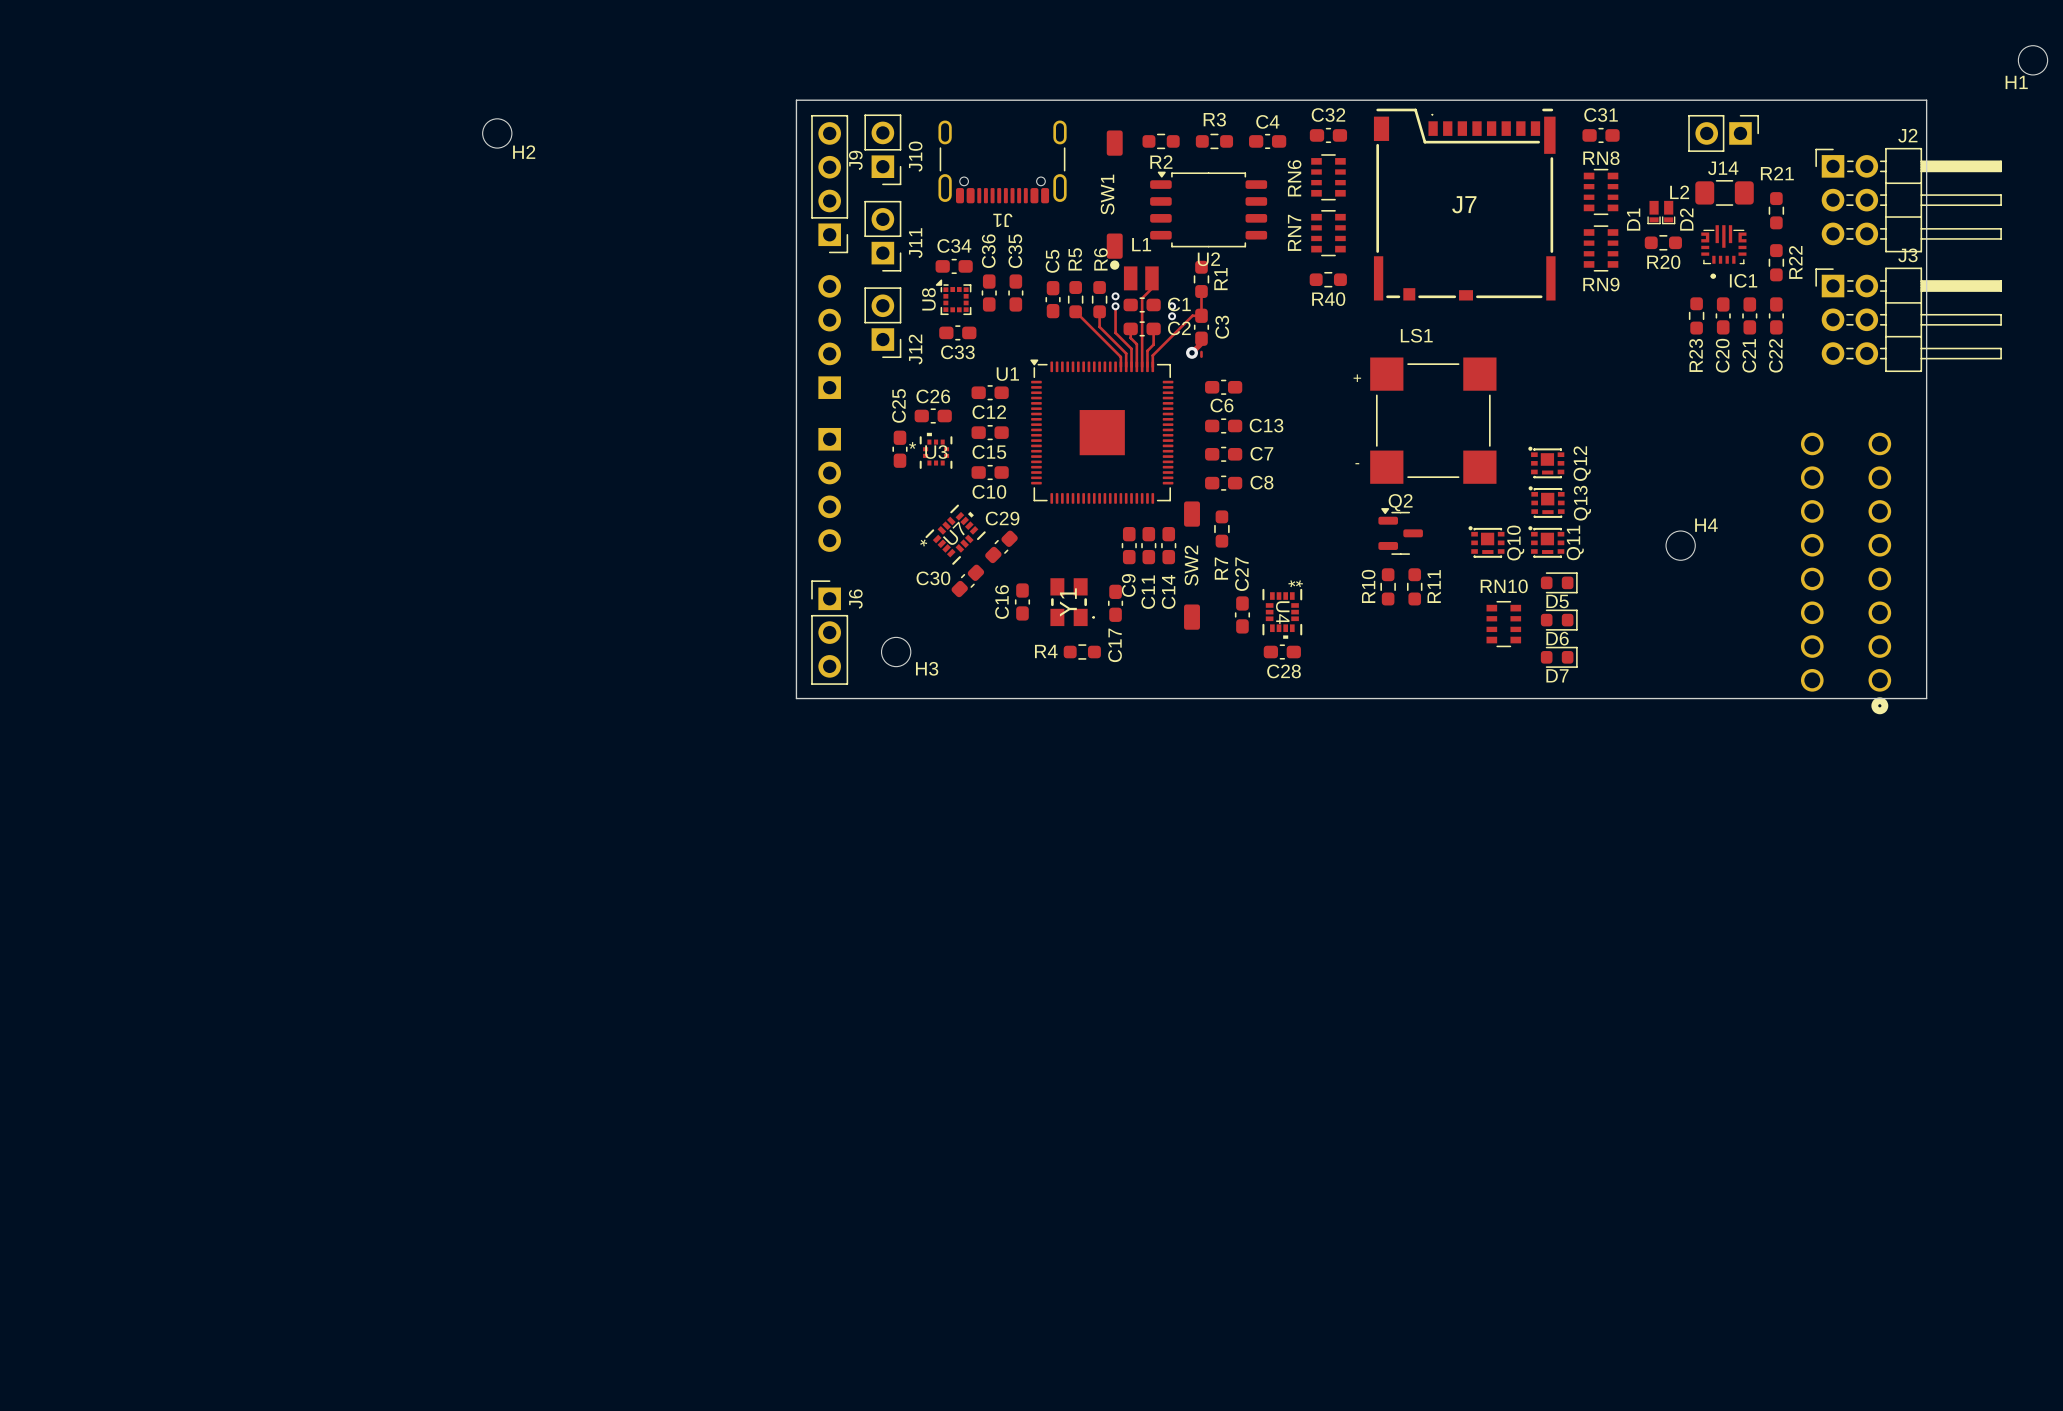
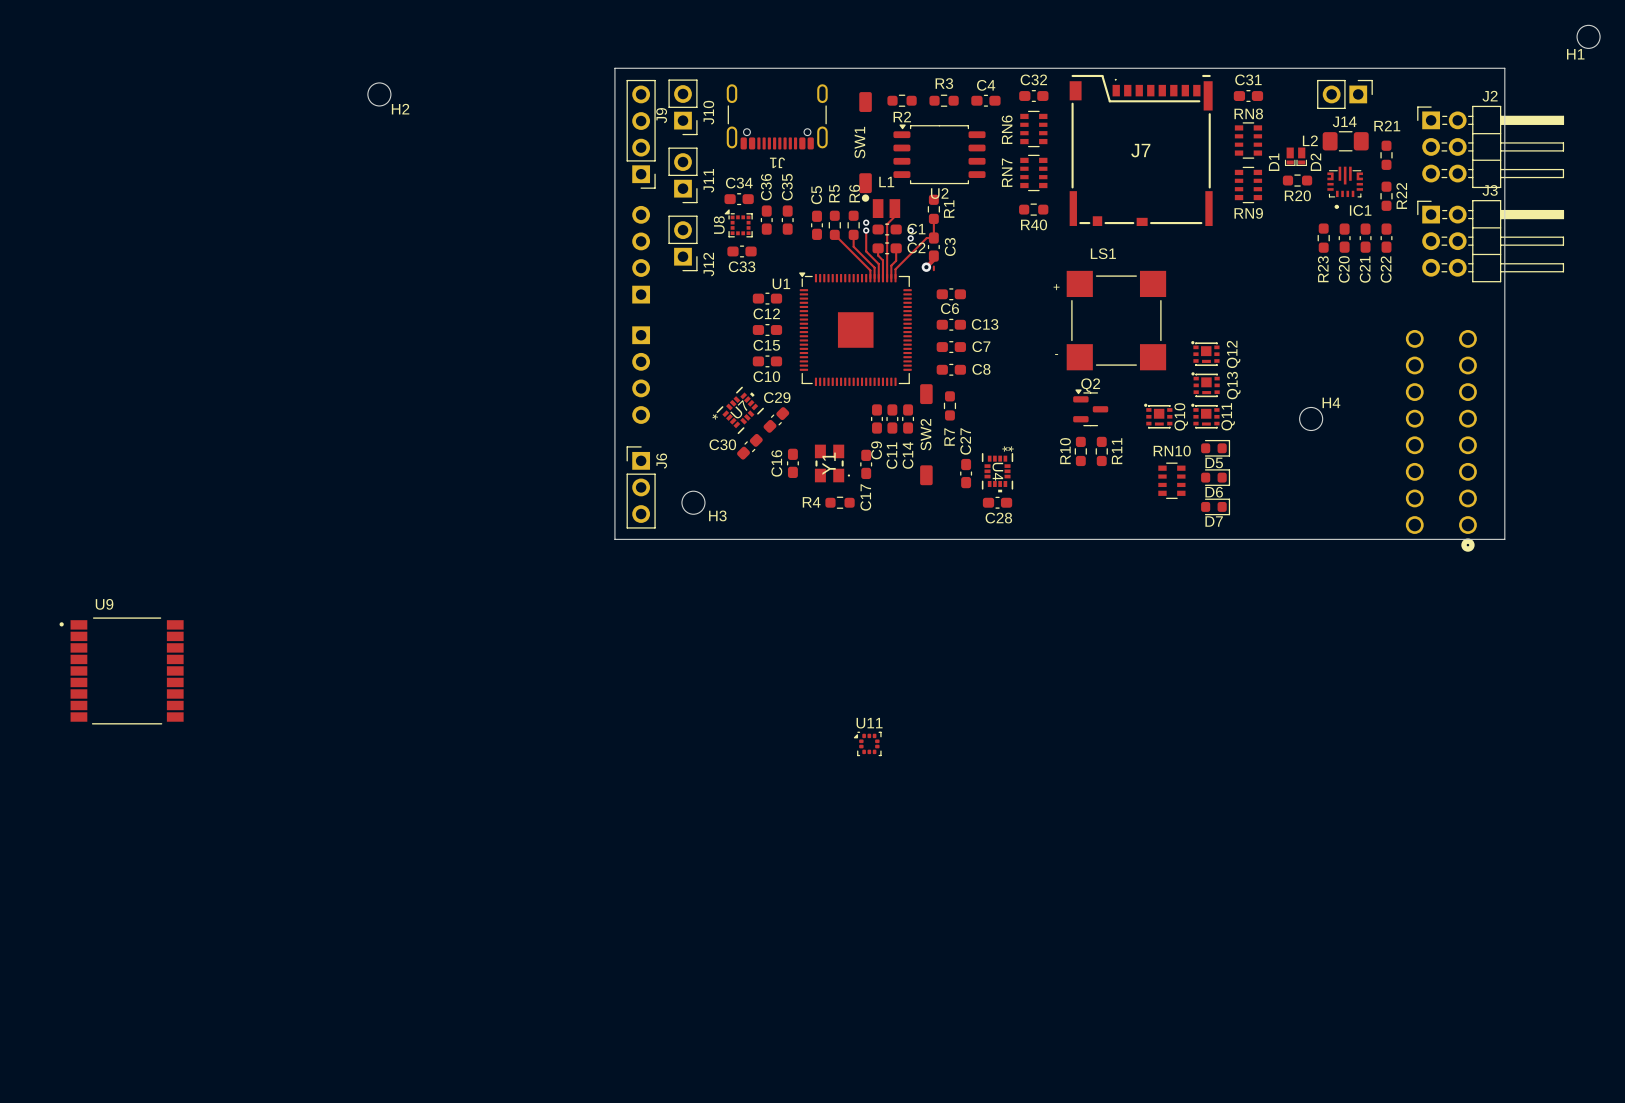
C26: (933, 415) -> none
C25: (899, 449) -> none
U3: (936, 450) -> none
U9: none -> (121, 670)
U11: none -> (867, 743)

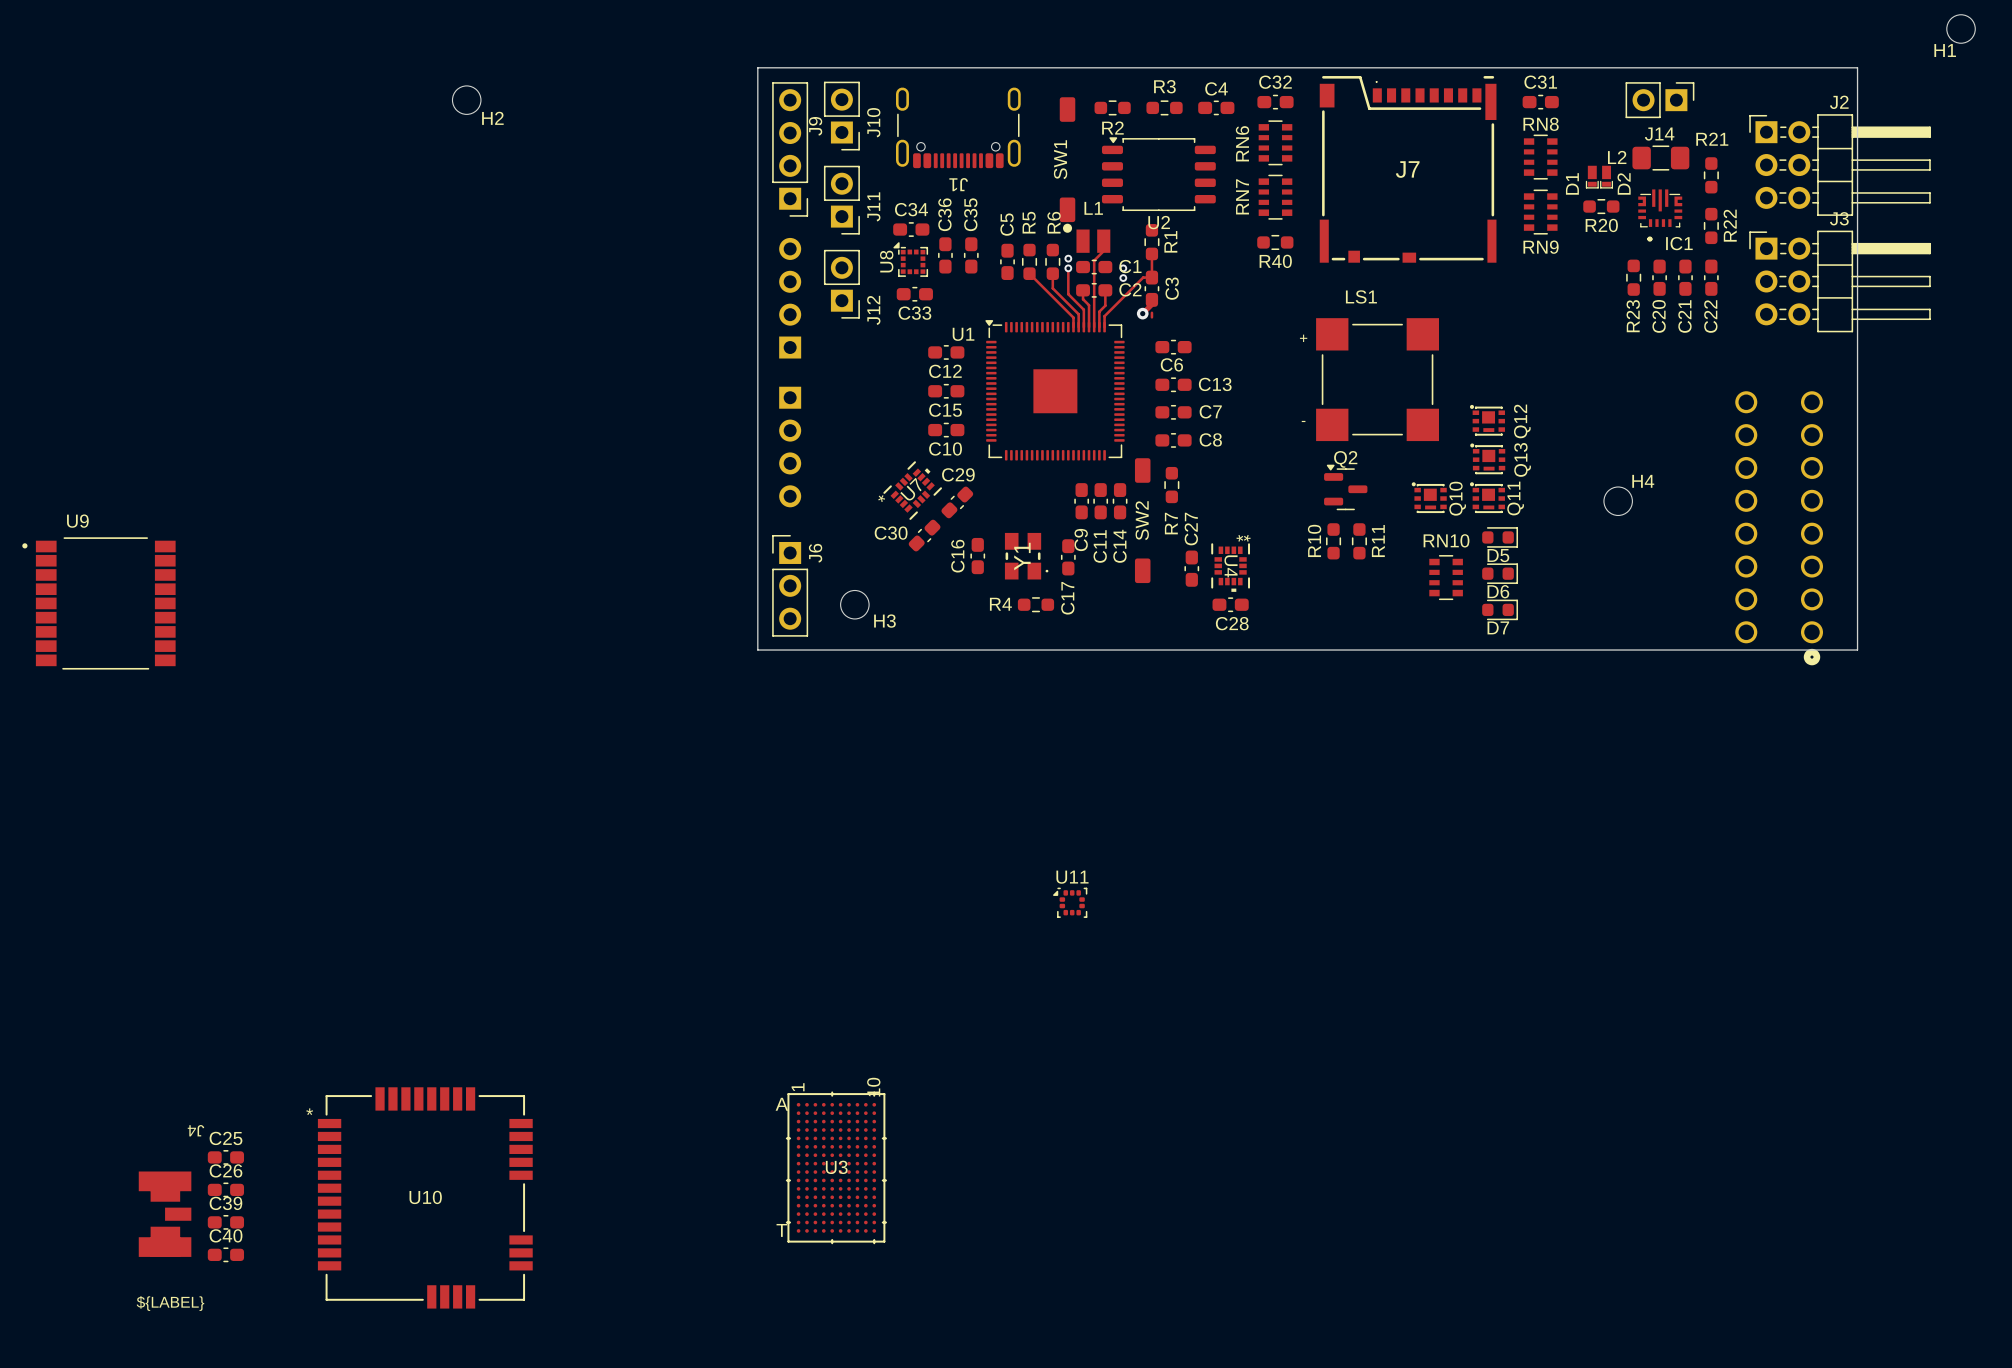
U9 position: (121, 670) -> (98, 603)
C25: none -> (225, 1157)
U3: none -> (836, 1167)
C26: none -> (225, 1189)
U10: none -> (425, 1197)
J4: none -> (165, 1214)
C39: none -> (225, 1222)
C40: none -> (225, 1254)

